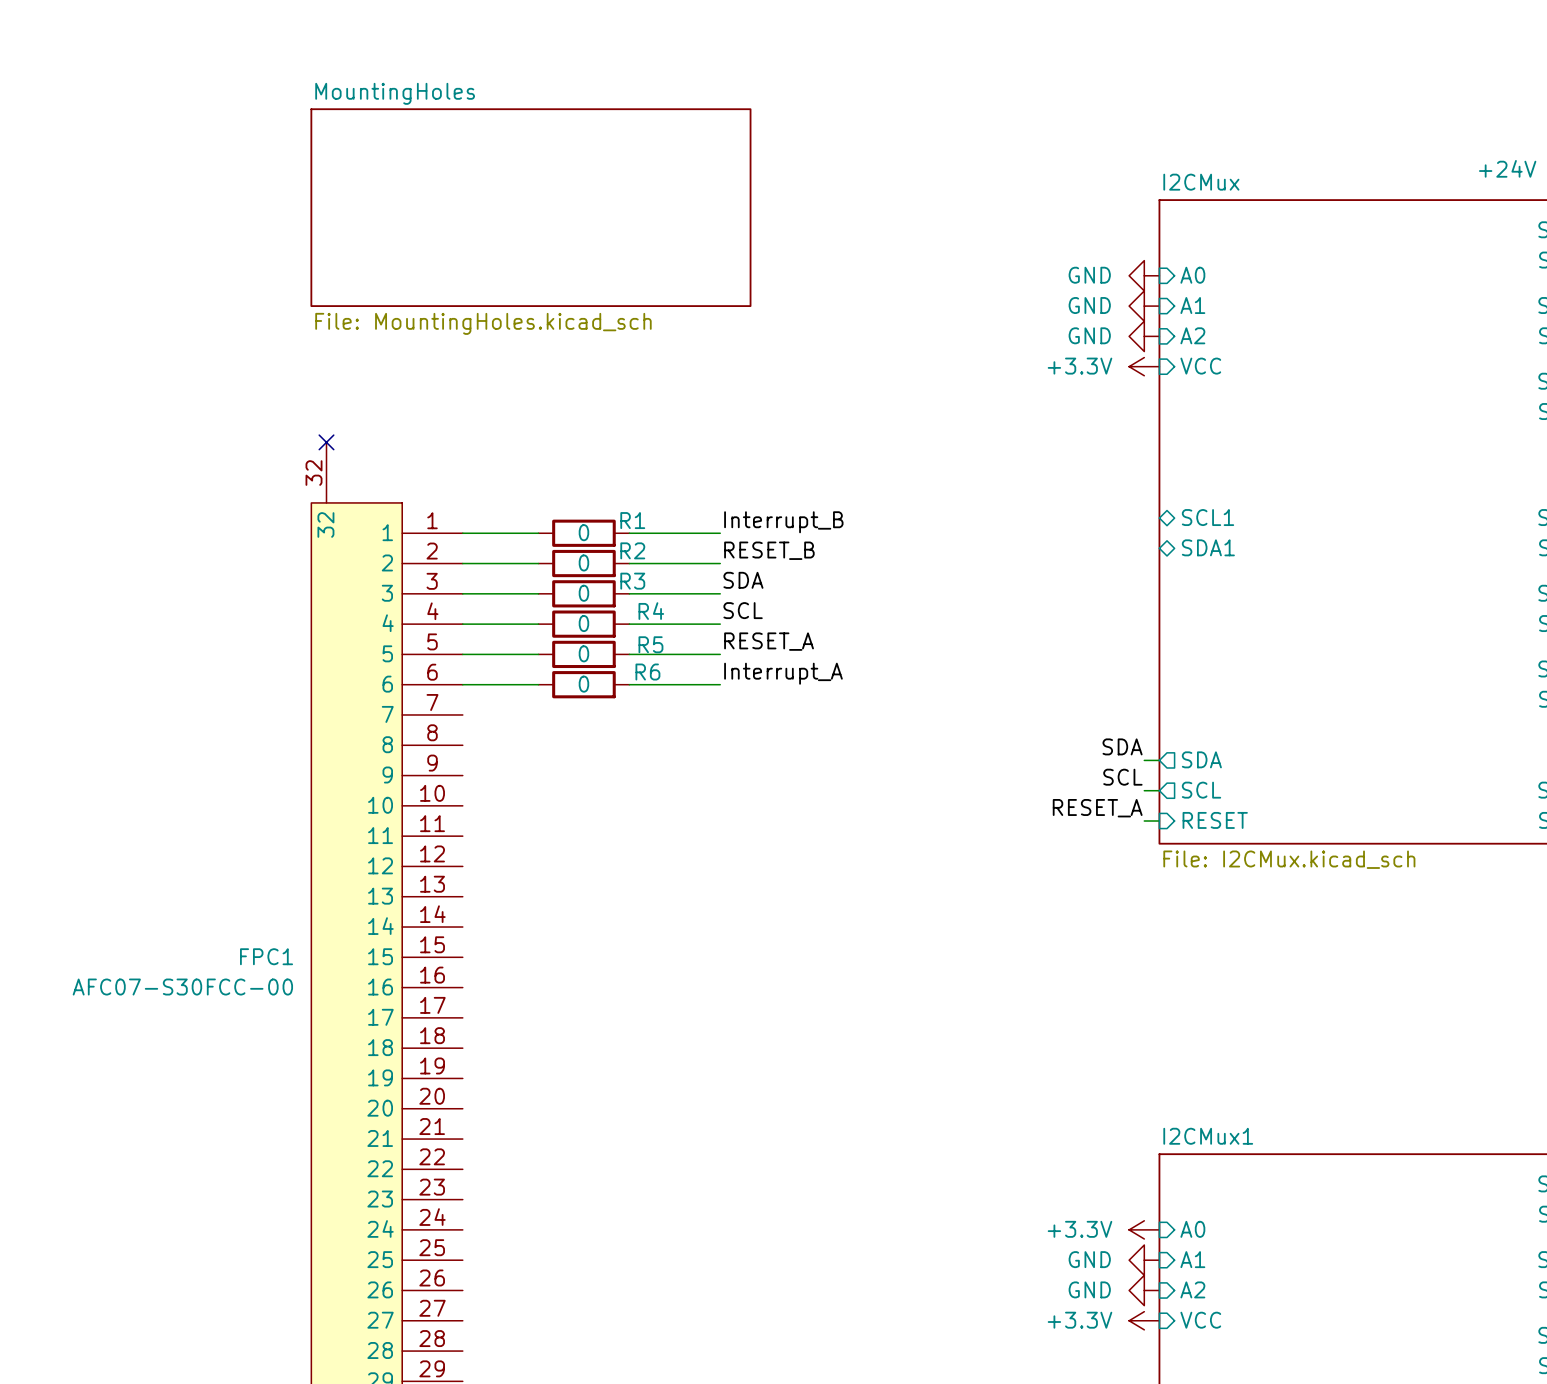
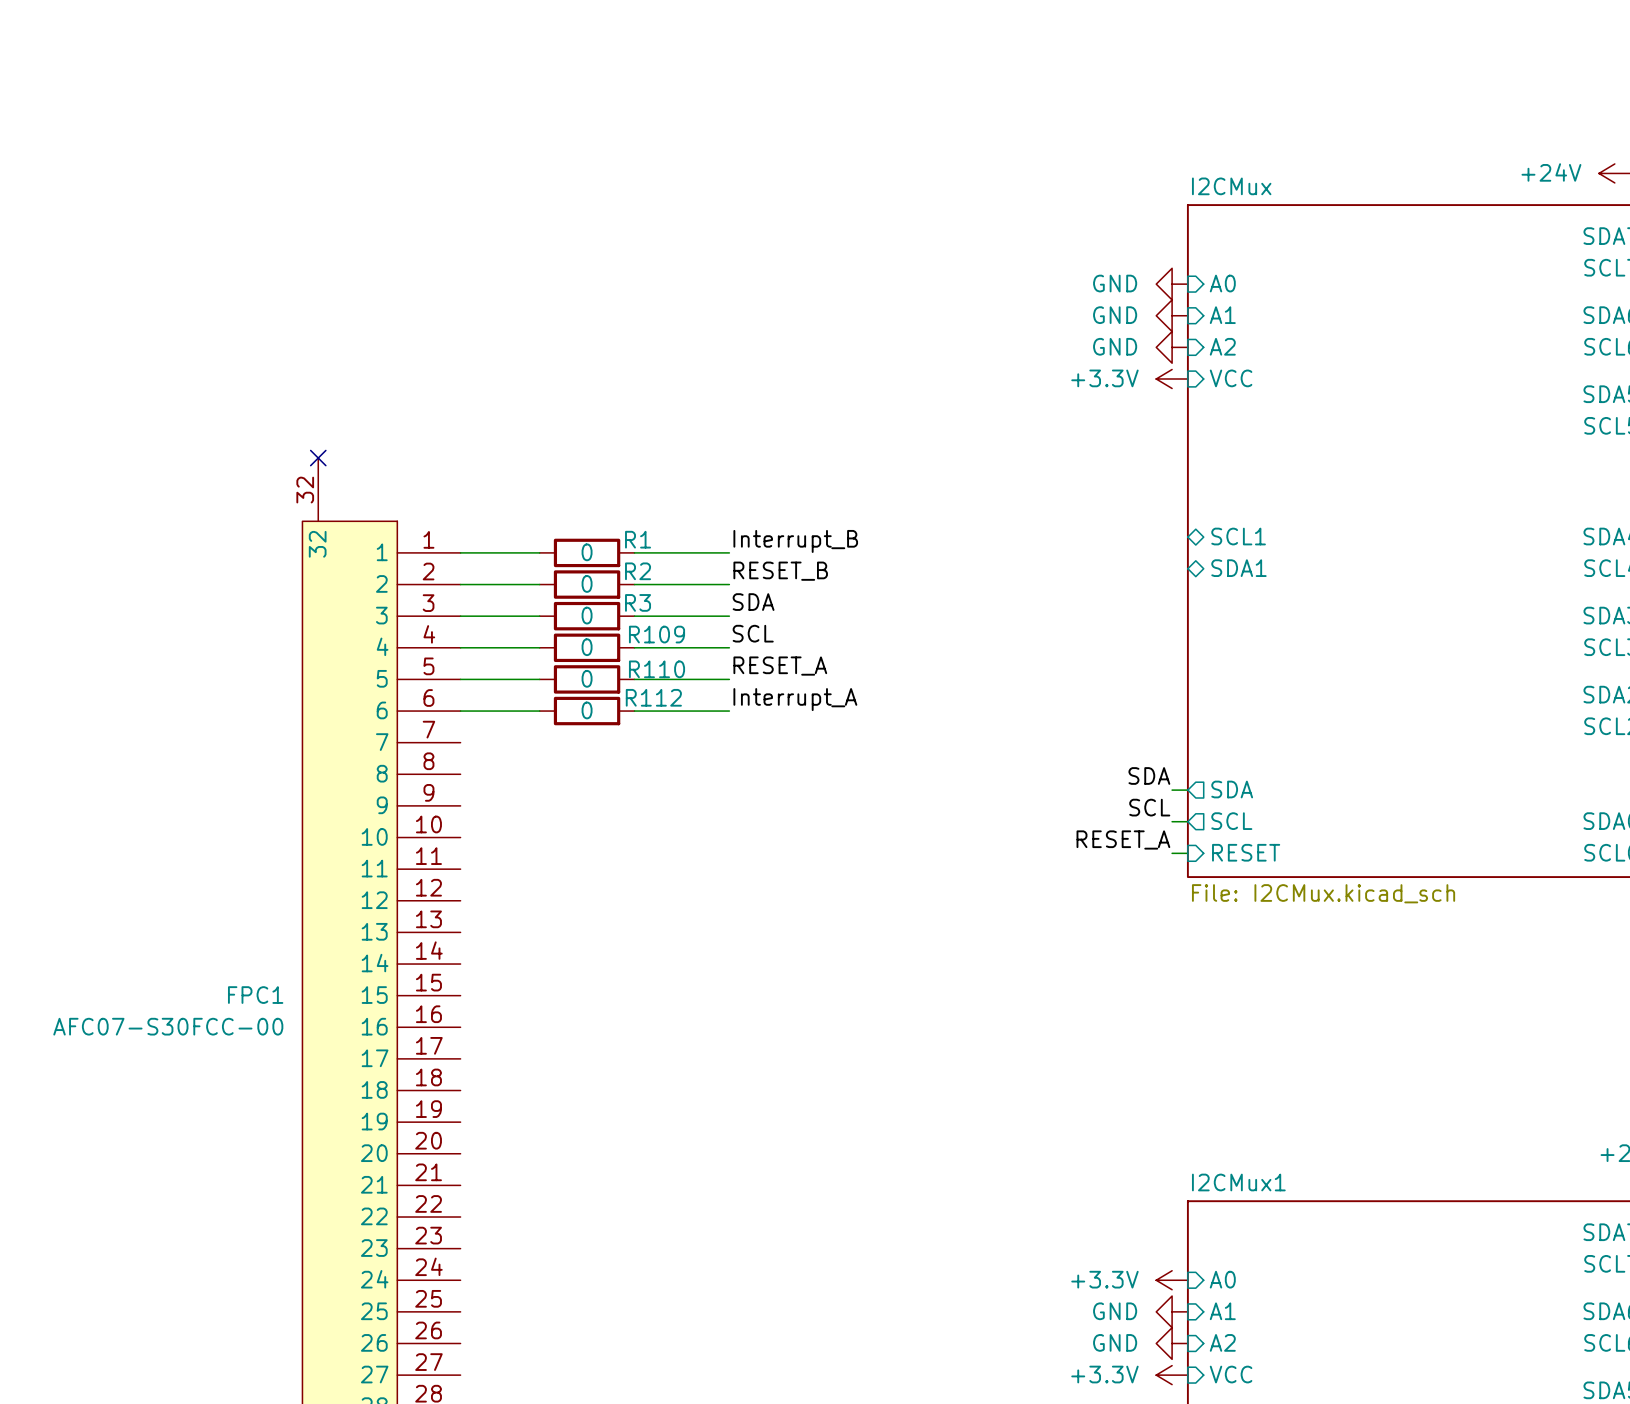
sheet MountingHoles: File: MountingHoles.kicad_sch (530, 207) -> none
R4 name: R4 (651, 611) -> R109 (657, 634)
R5 name: R5 (650, 644) -> R110 (657, 669)
R6 name: R6 (647, 672) -> R112 (653, 697)

